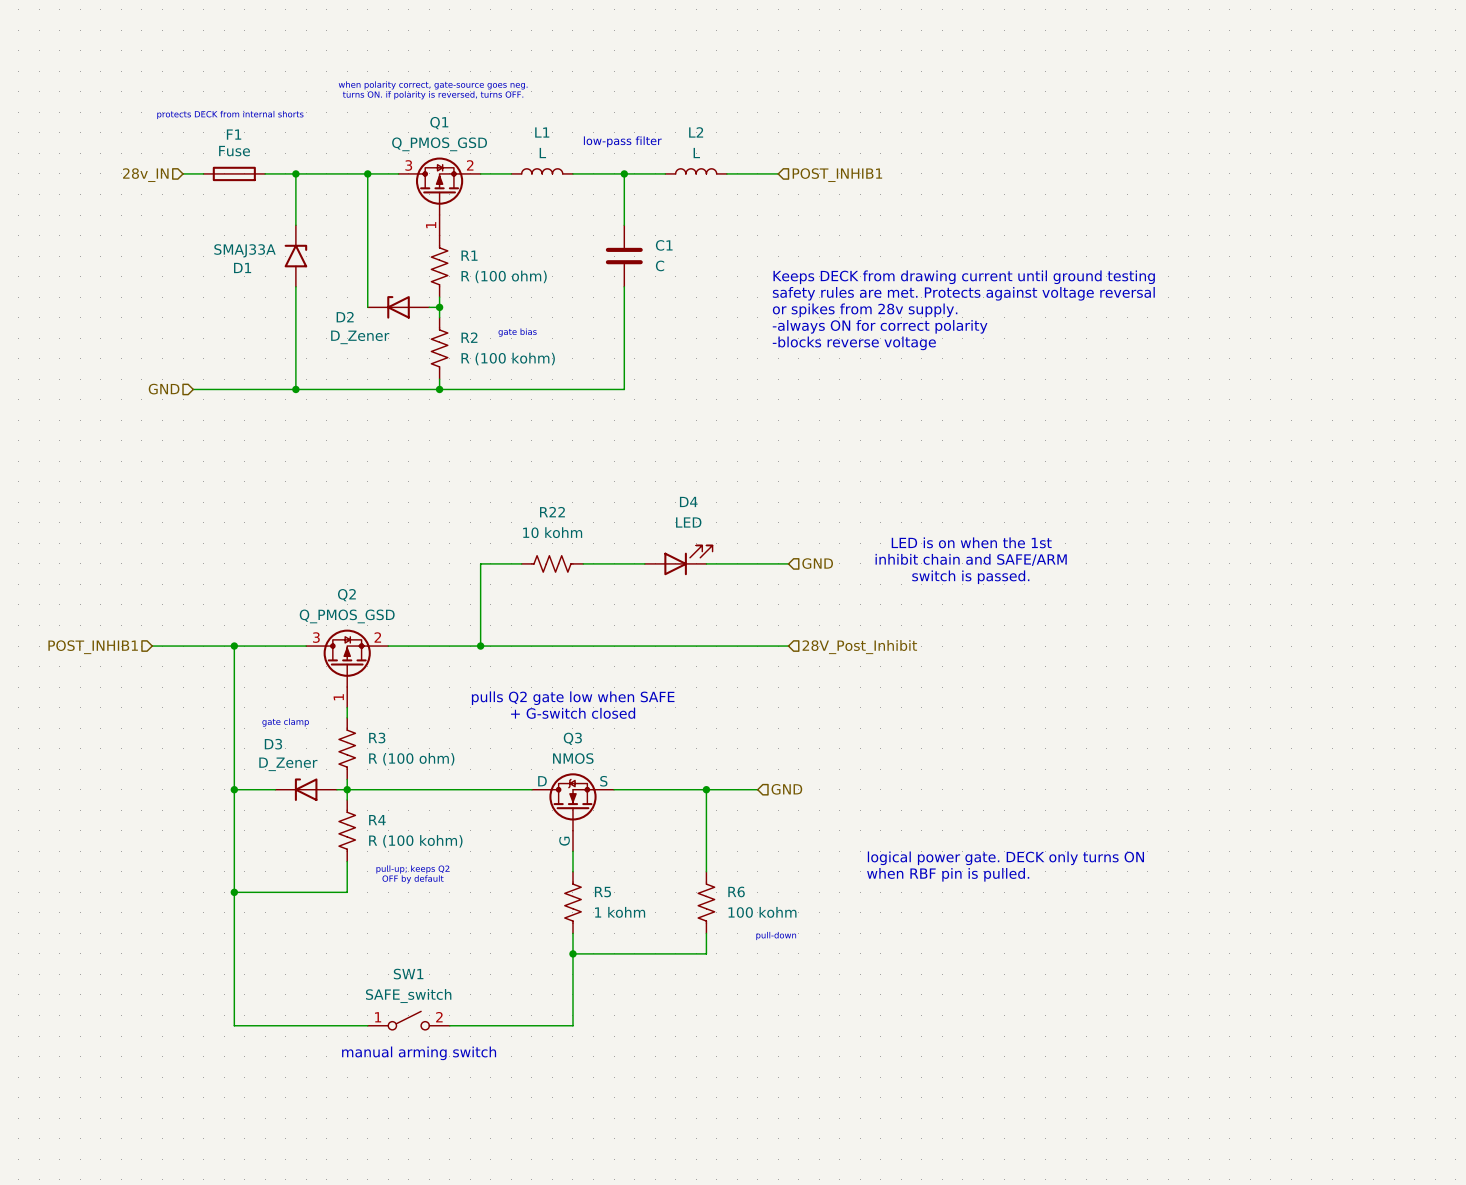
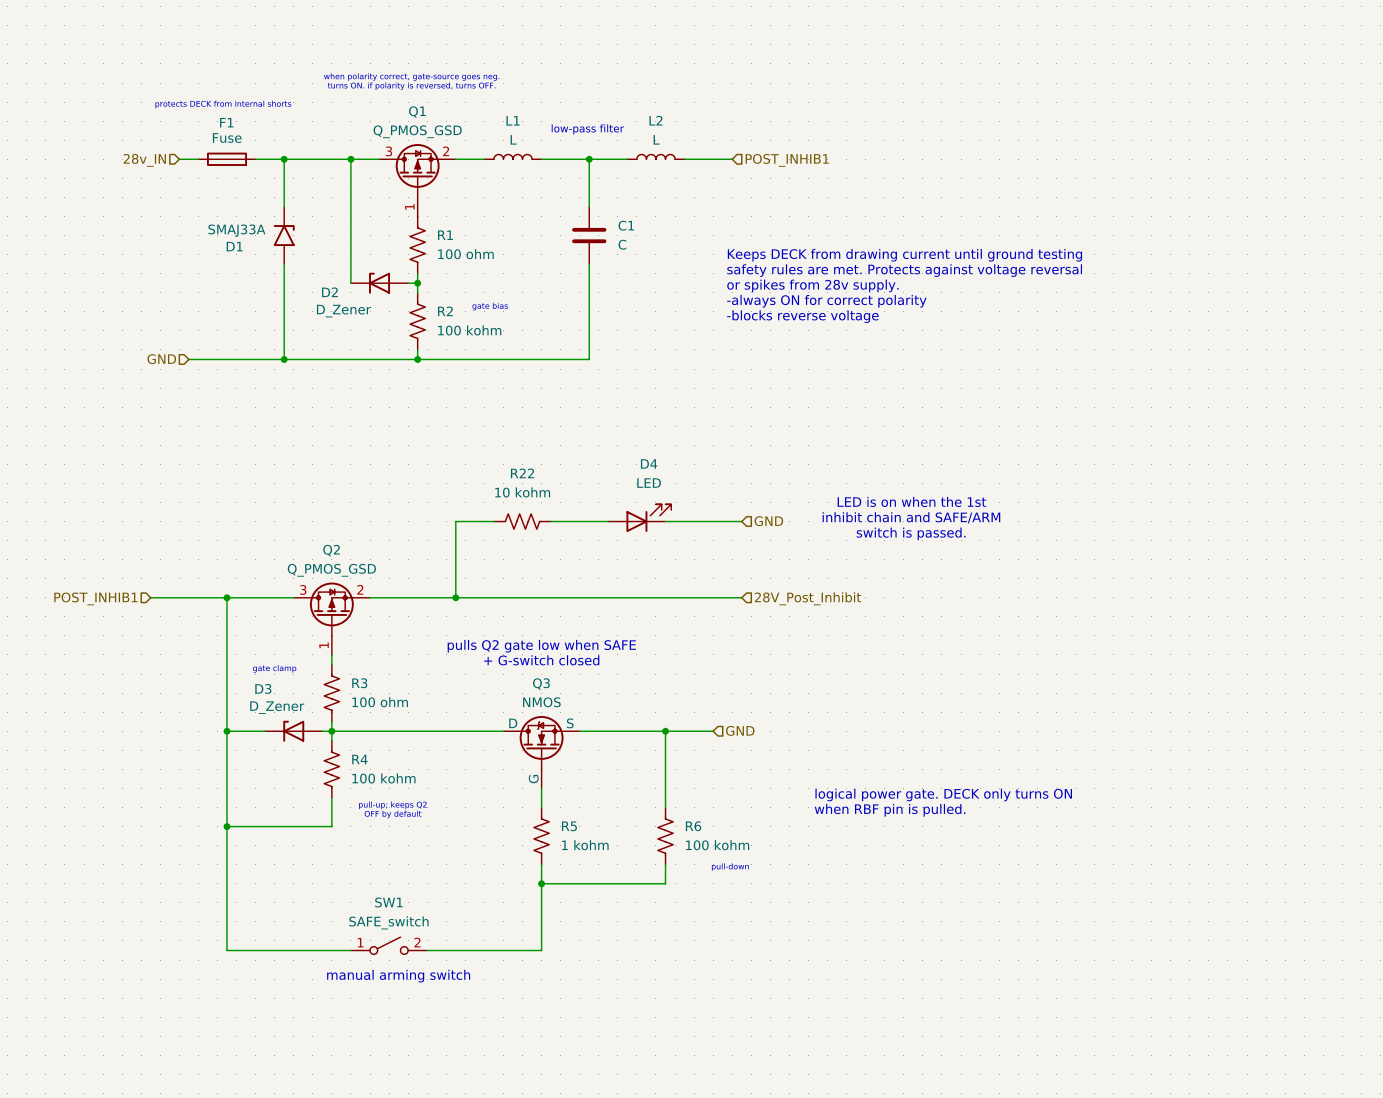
R1 value: R (100 ohm) (504, 276) -> 100 ohm (465, 254)
R2 value: R (100 kohm) (508, 359) -> 100 kohm (469, 330)
R3 value: R (100 ohm) (411, 759) -> 100 ohm (380, 702)
R4 value: R (100 kohm) (415, 841) -> 100 kohm (383, 778)

